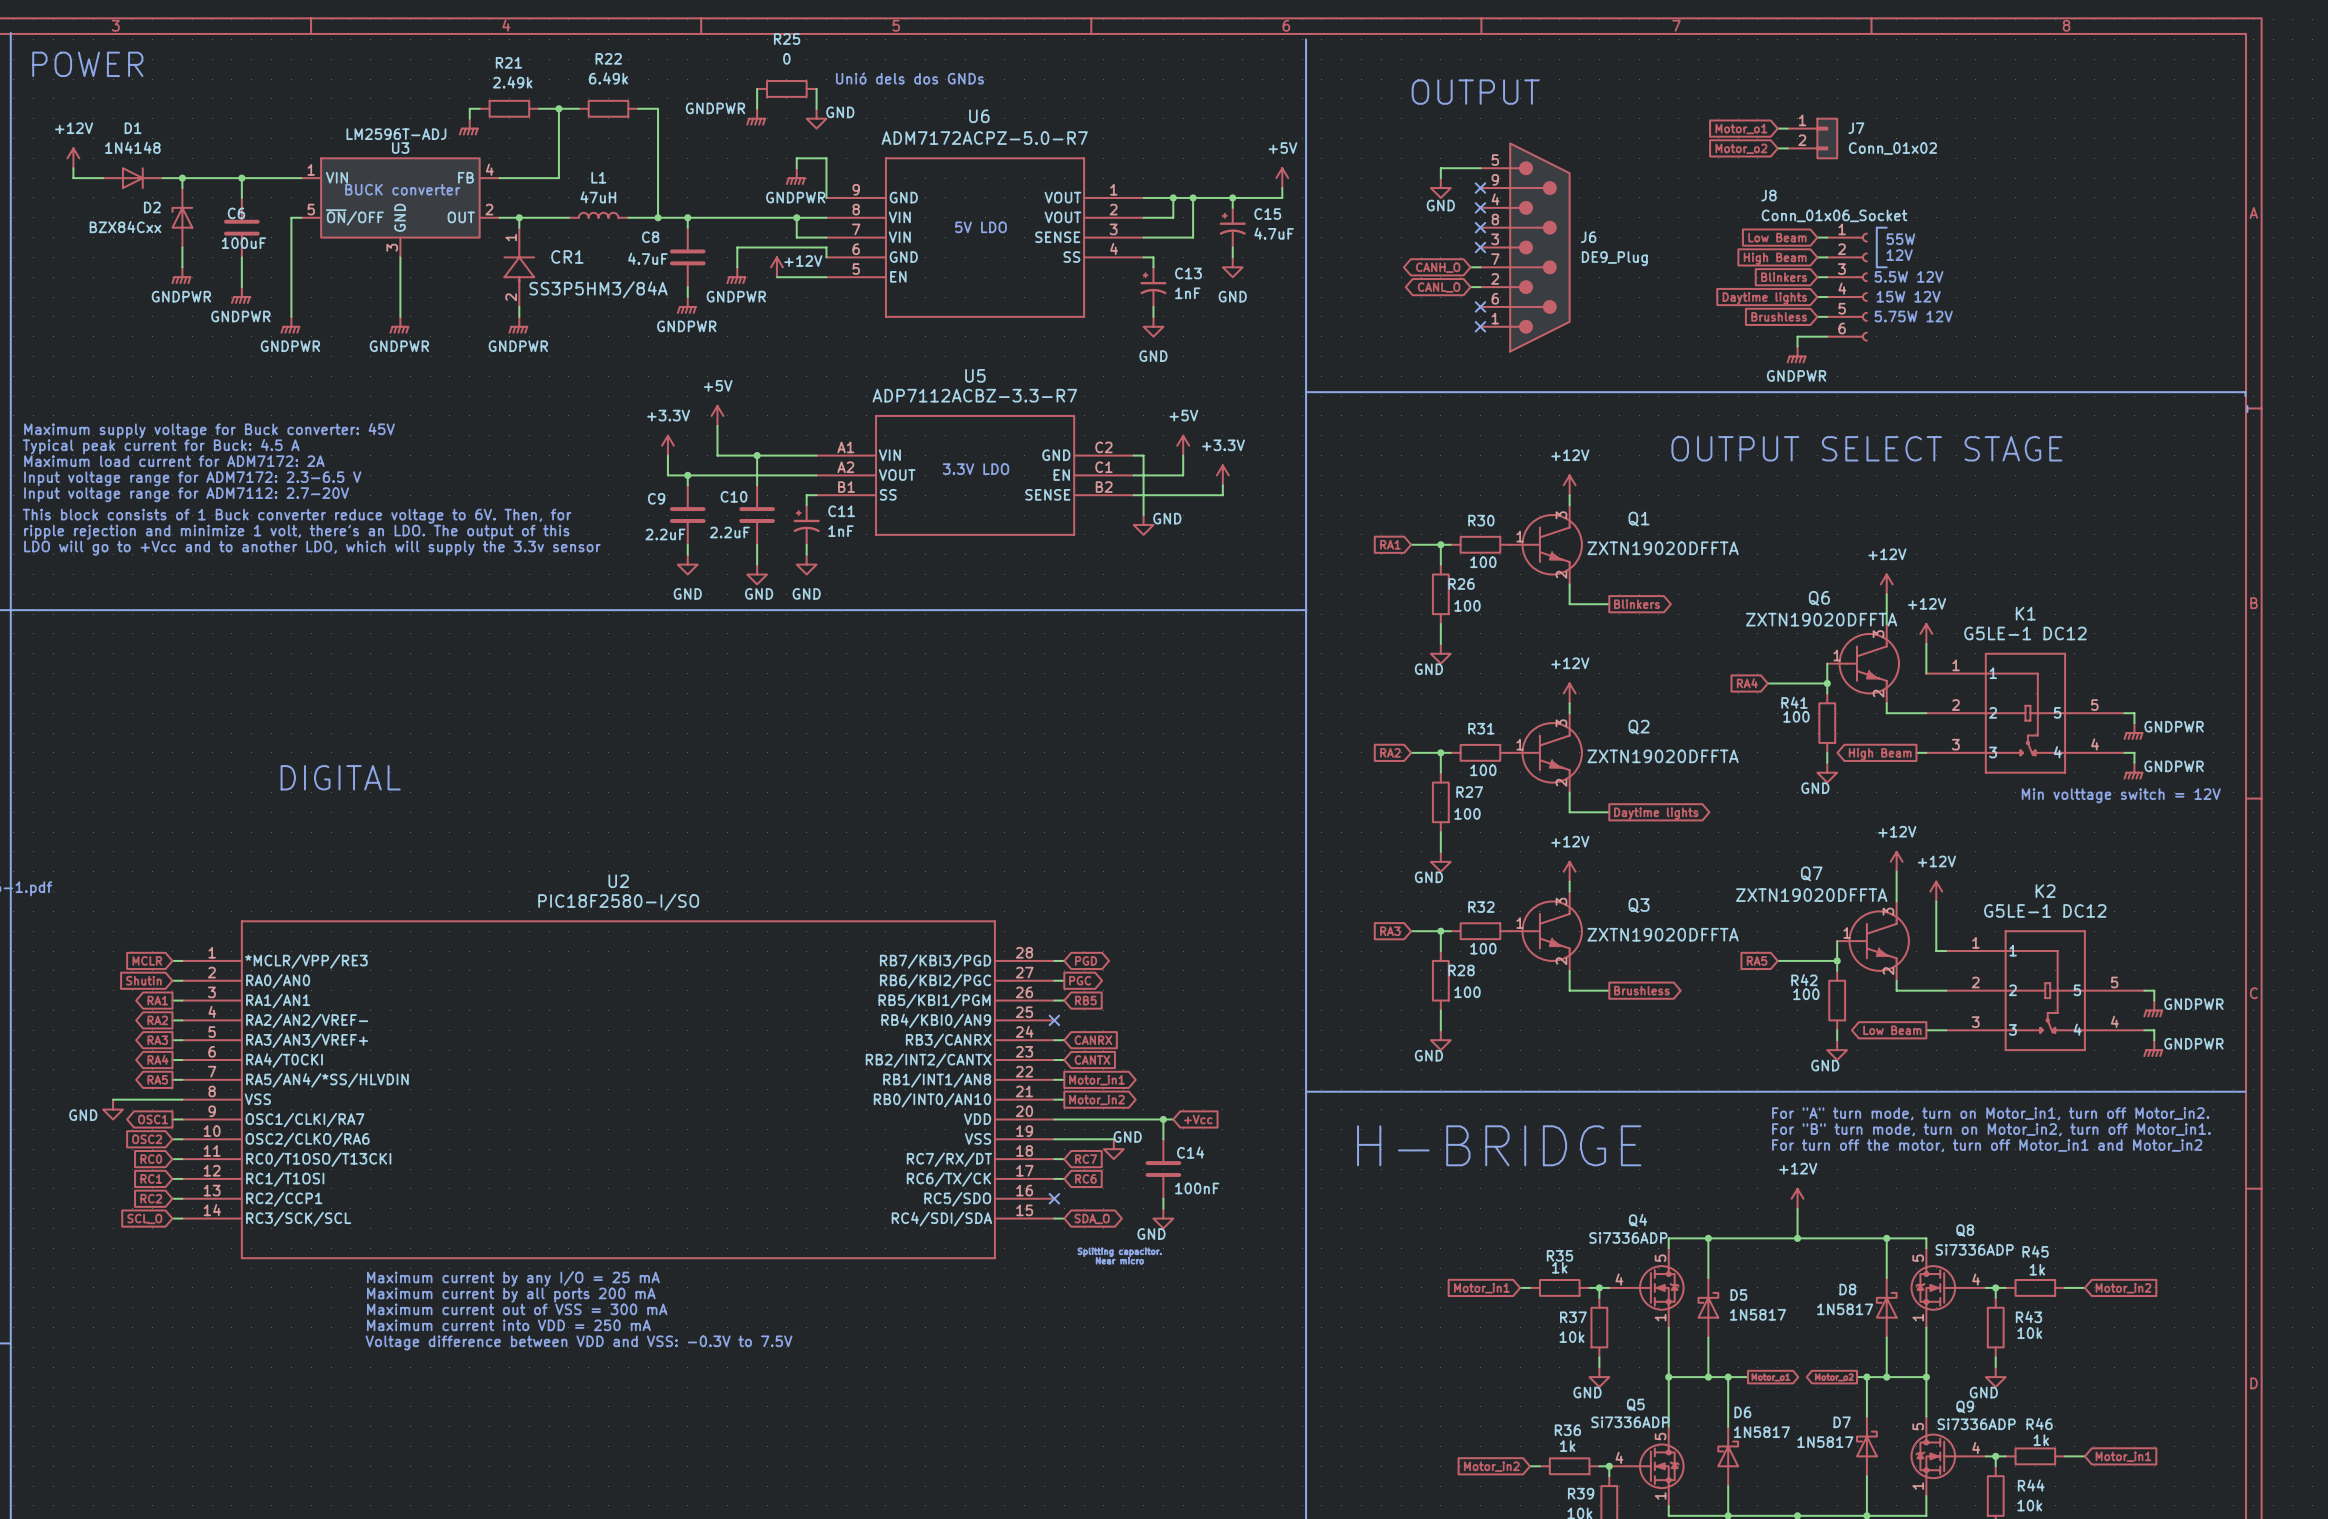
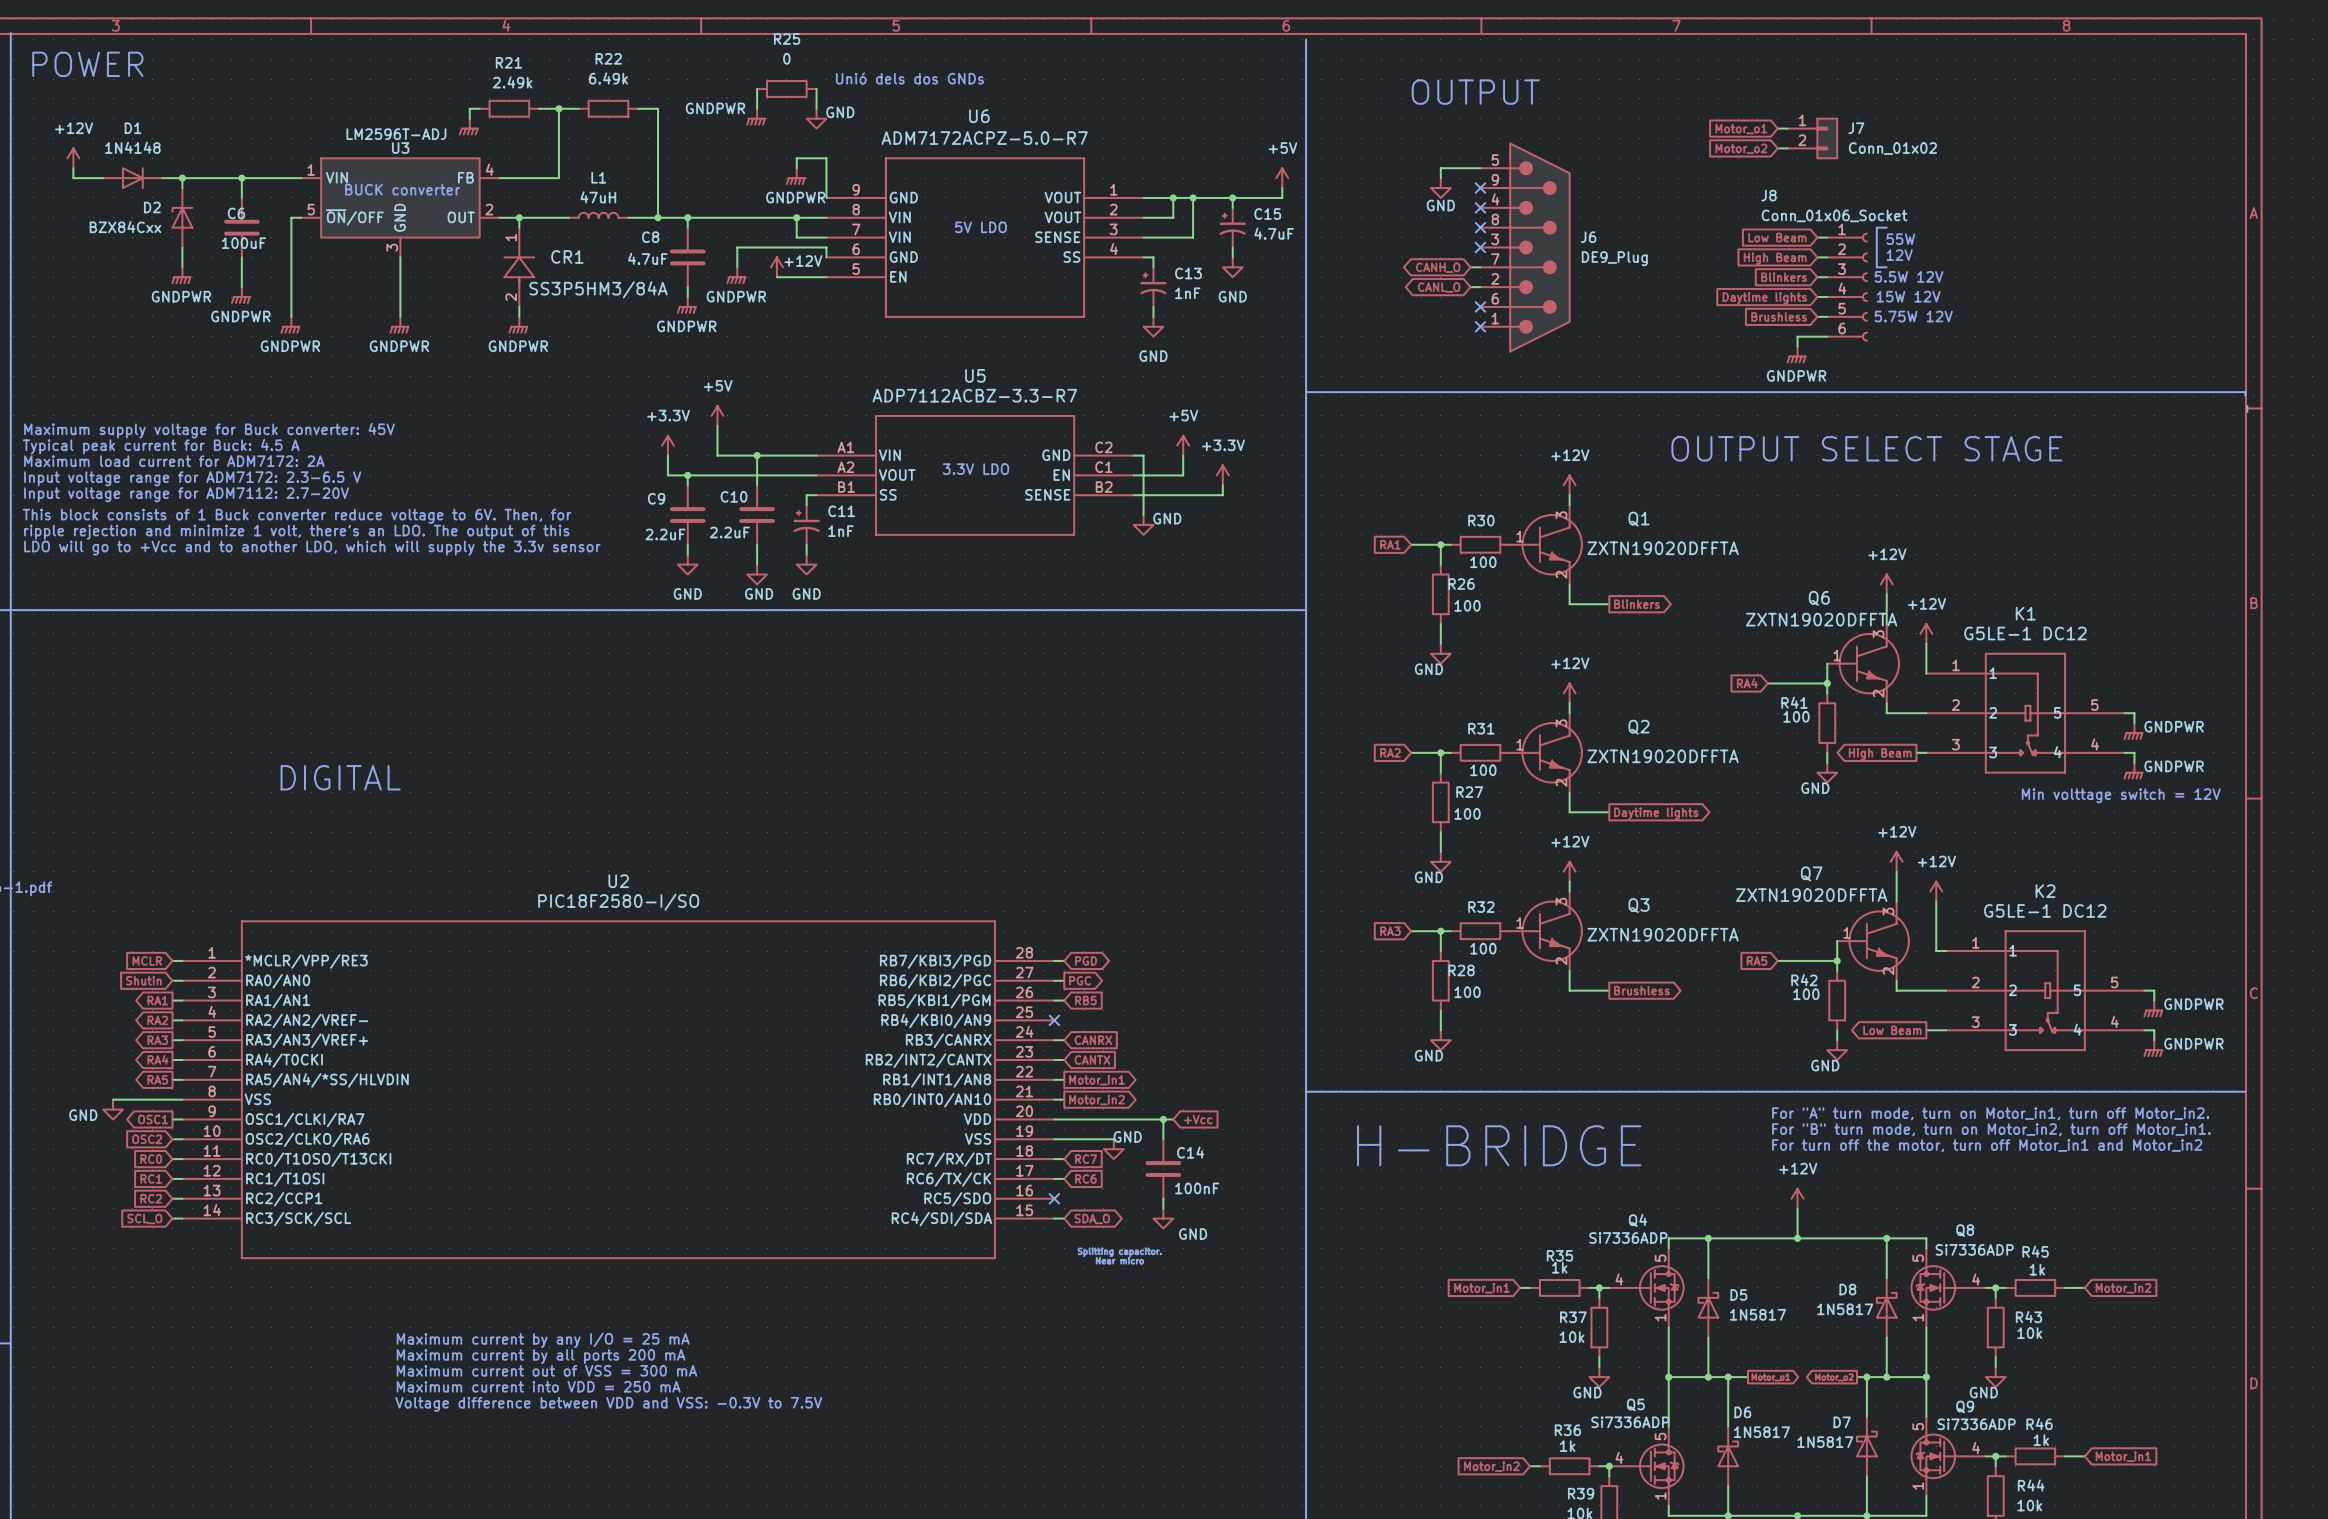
power symbol text position: GND (1151, 1234) -> GND (1193, 1234)
text position: Maximum current by any I/O = 25 mA (513, 1278) -> Maximum current by any I/O = 25 mA (543, 1340)
text position: Maximum current by all ports 200 mA (511, 1295) -> Maximum current by all ports 200 mA (541, 1356)
text position: Maximum current out of VSS = 300 mA (517, 1309) -> Maximum current out of VSS = 300 mA (546, 1370)
text position: Maximum current into VDD = 250 mA (508, 1325) -> Maximum current into VDD = 250 mA (538, 1386)
text position: Voltage difference between VDD and VSS: -0.3V to 7.5V (579, 1342) -> Voltage difference between VDD and VSS: -0.3V to 7.5V (608, 1404)

